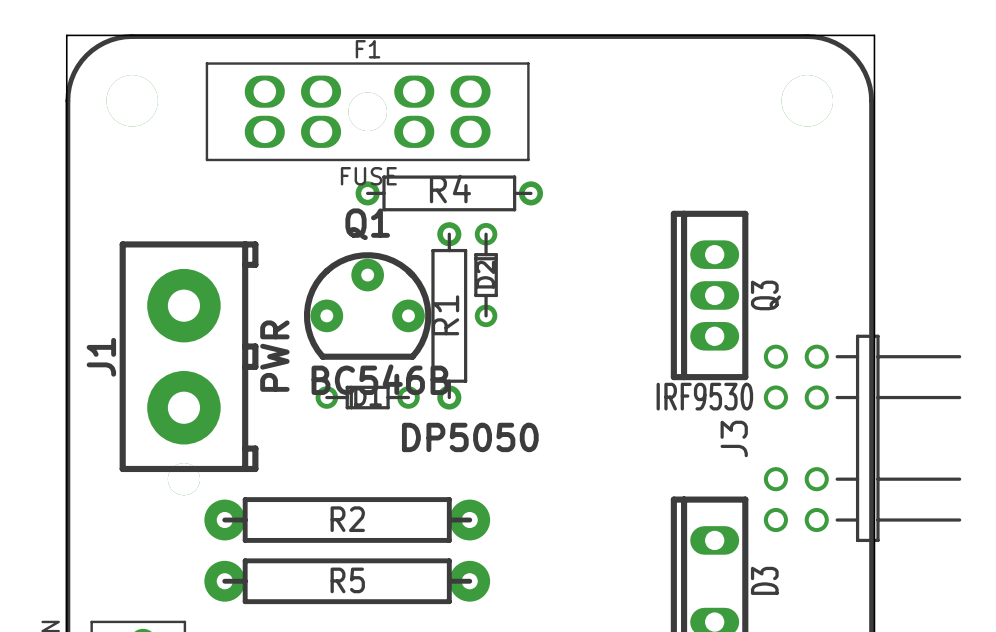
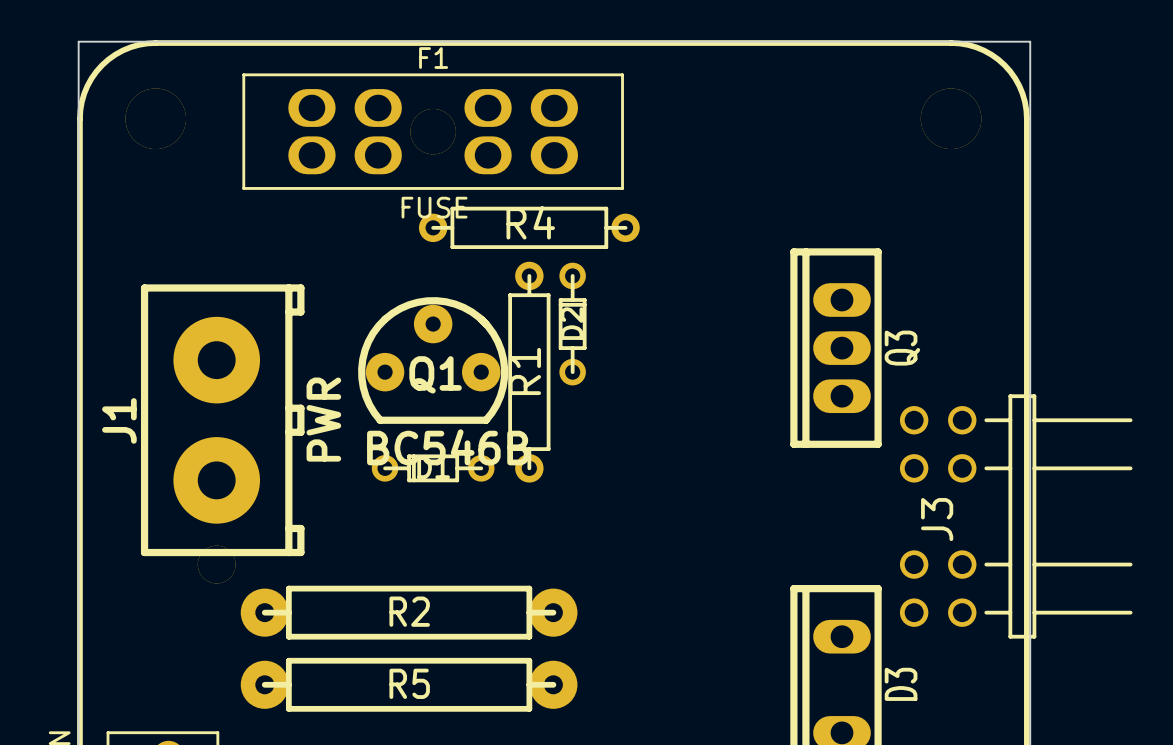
Q1 name position: Q1 (367, 224) -> Q1 (435, 374)
Q3 value: IRF9530 (704, 396) -> none
DP5050 name: DP5050 (470, 437) -> none
J3 name position: J3 (734, 438) -> J3 (937, 519)

